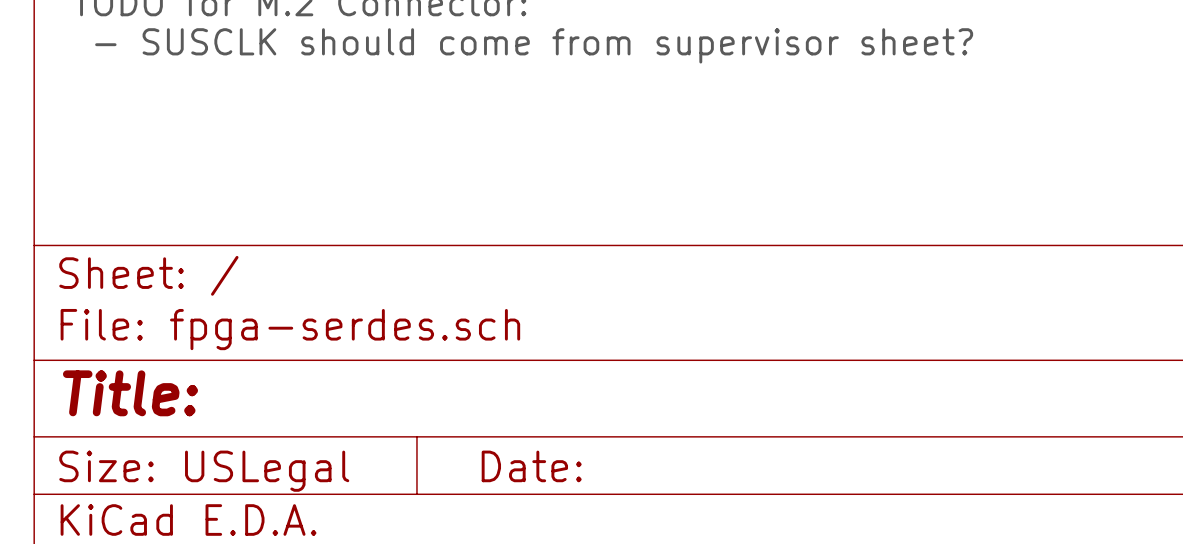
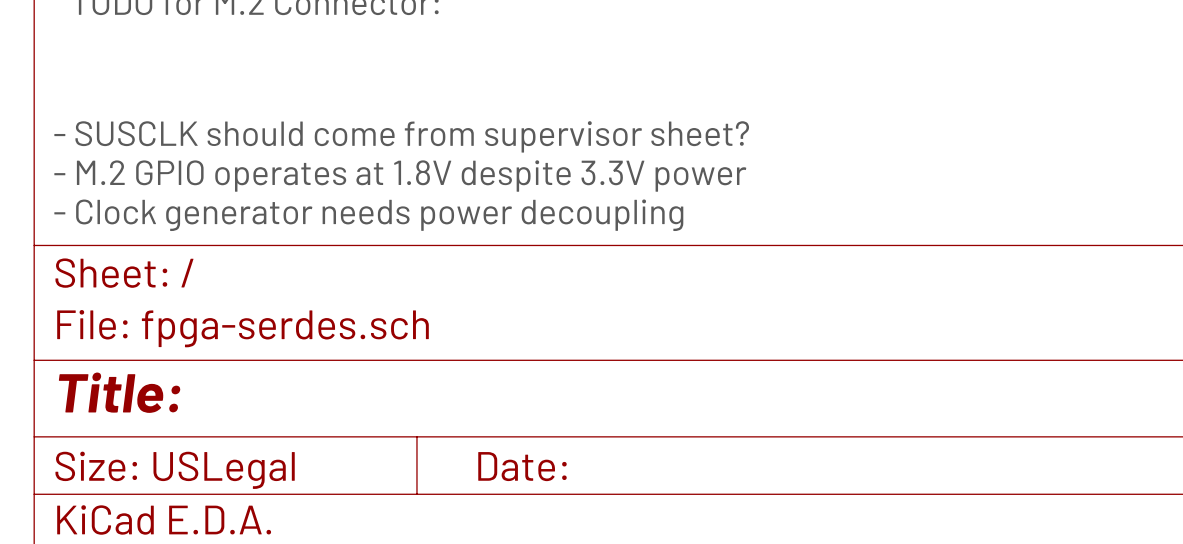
text position: - SUSCLK should come from supervisor sheet? (534, 45) -> - SUSCLK should come from supervisor sheet? (401, 136)
text: none -> - M.2 GPIO operates at 1.8V despite 3.3V power (400, 176)
text: none -> - Clock generator needs power decoupling (368, 215)

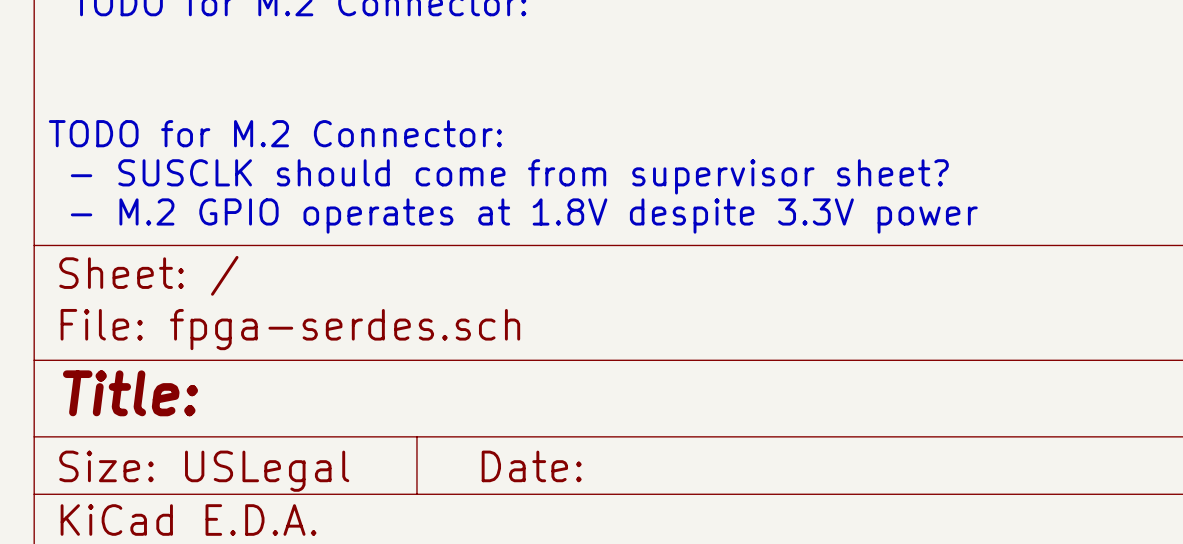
text: - SUSCLK should come from supervisor sheet? (401, 136) -> TODO for M.2 Connector: (275, 133)
text: - M.2 GPIO operates at 1.8V despite 3.3V power (400, 176) -> - SUSCLK should come from supervisor sheet? (509, 176)
text: - Clock generator needs power decoupling (368, 215) -> - M.2 GPIO operates at 1.8V despite 3.3V power (524, 216)

